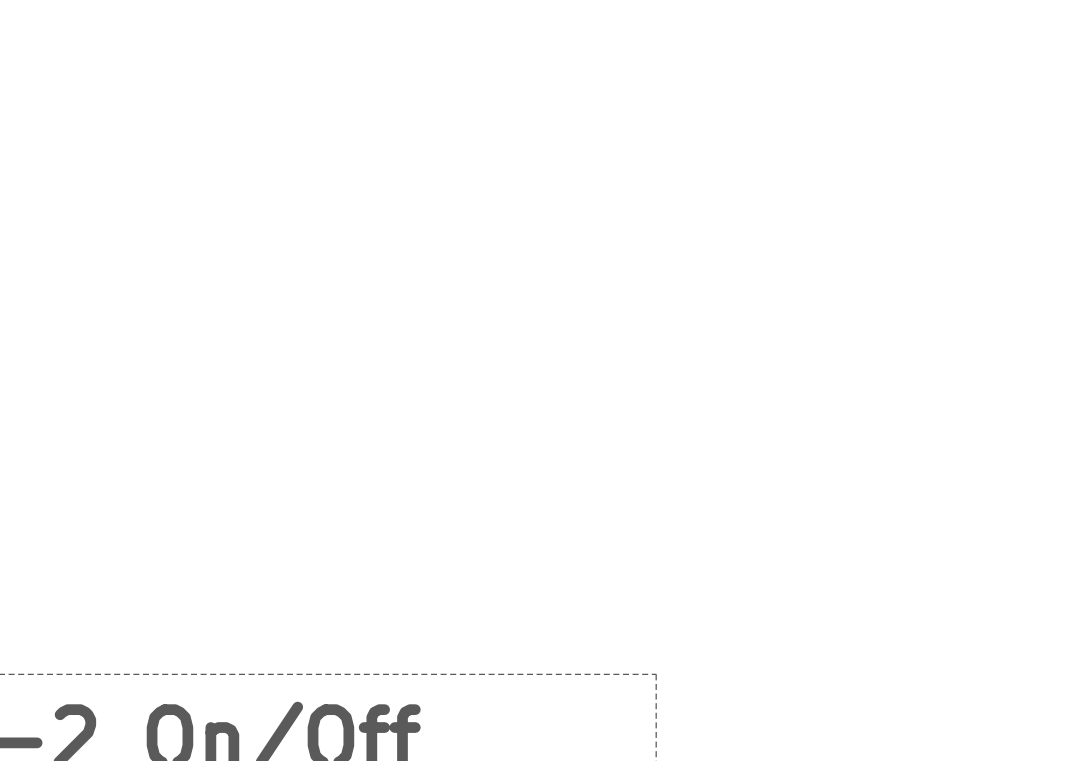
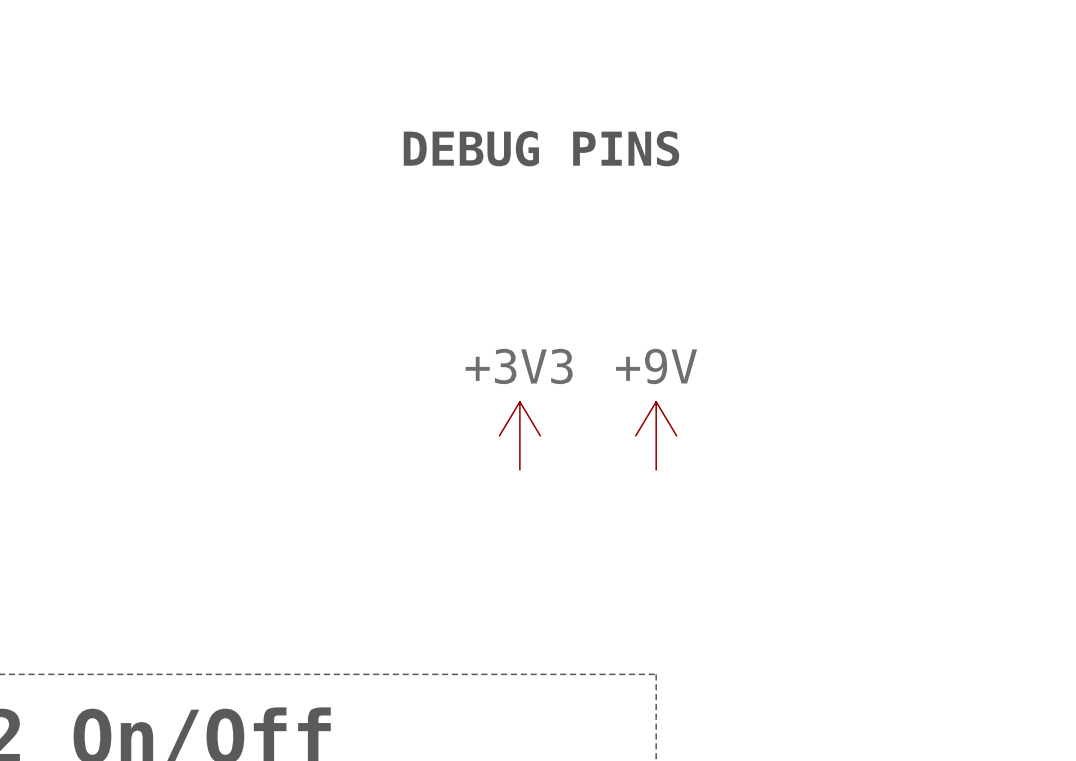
text: none -> DEBUG PINS (541, 148)
power symbol: none -> +3V3 (519, 435)
power symbol: none -> +9V (656, 435)

